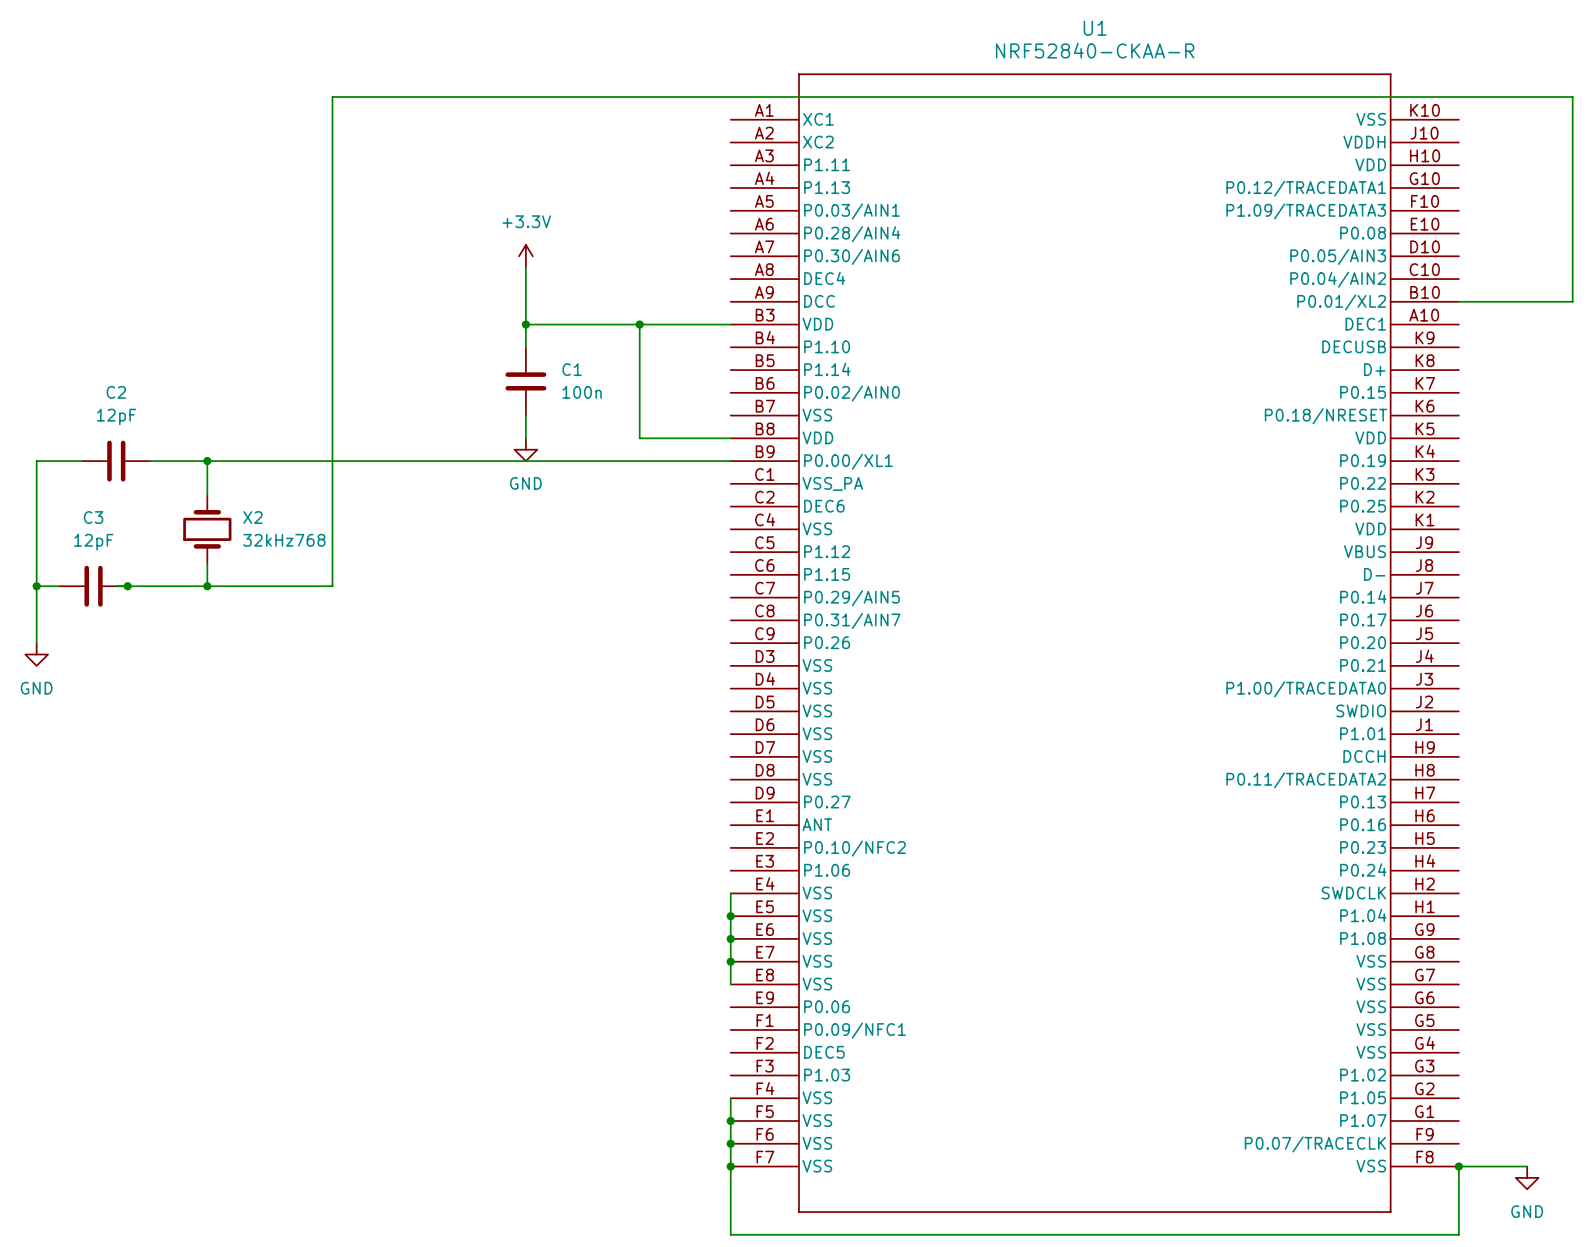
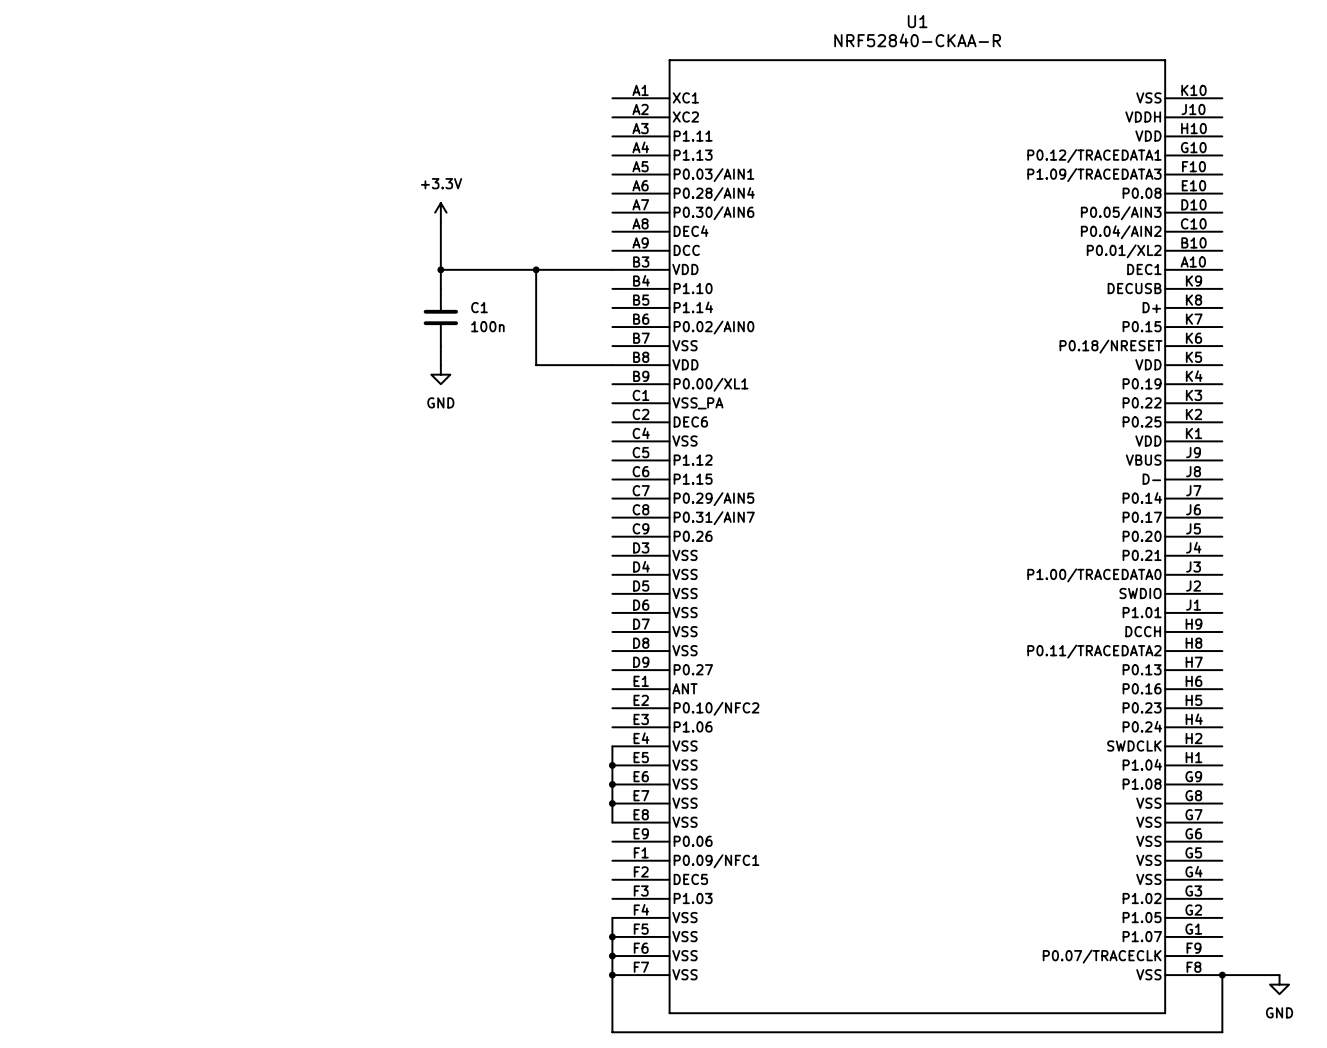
wire: (1458, 301) (1572, 301) (1572, 96) (332, 96) (332, 586) (116, 586) -> none
wire: (82, 461) (36, 461) (36, 643) -> none
C2: 12pF (116, 461) -> none
wire: (150, 461) (730, 461) -> none
wire: (207, 461) (207, 495) -> none
junction: (207, 461) -> none
X2: 32kHz768 (207, 529) -> none
wire: (207, 563) (207, 586) -> none
wire: (36, 586) (59, 586) -> none
junction: (36, 586) -> none
C3: 12pF (93, 586) -> none
junction: (127, 586) -> none
junction: (207, 586) -> none
power symbol: GND (36, 654) -> none

